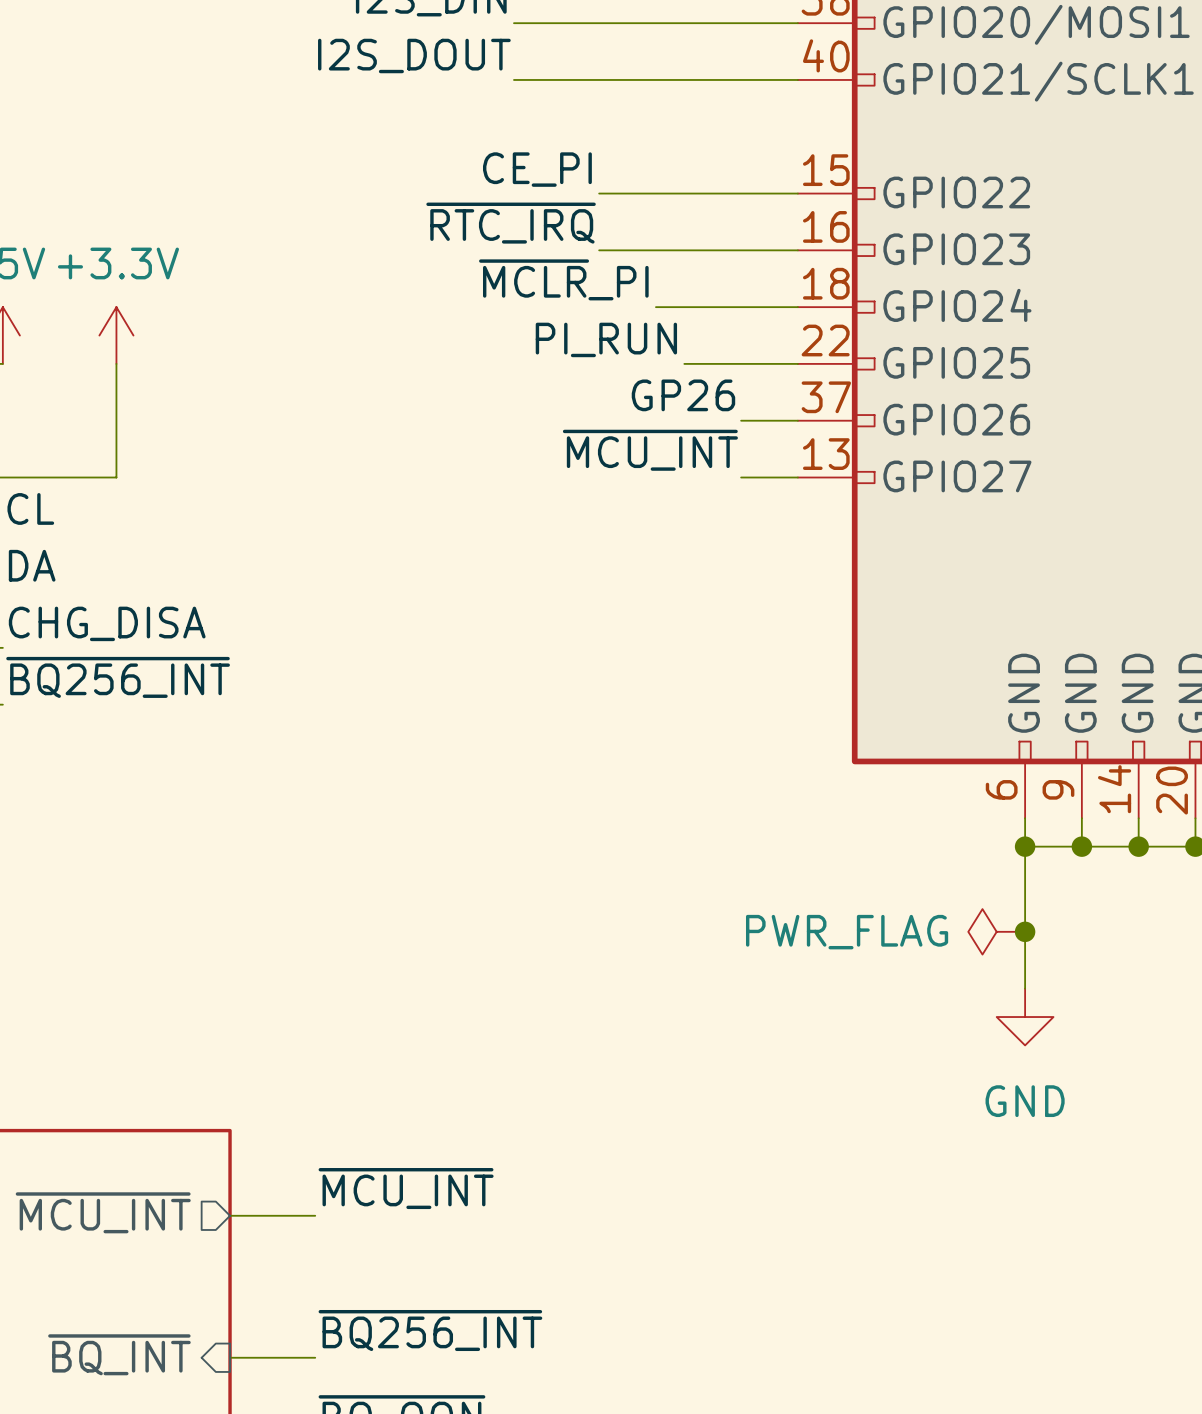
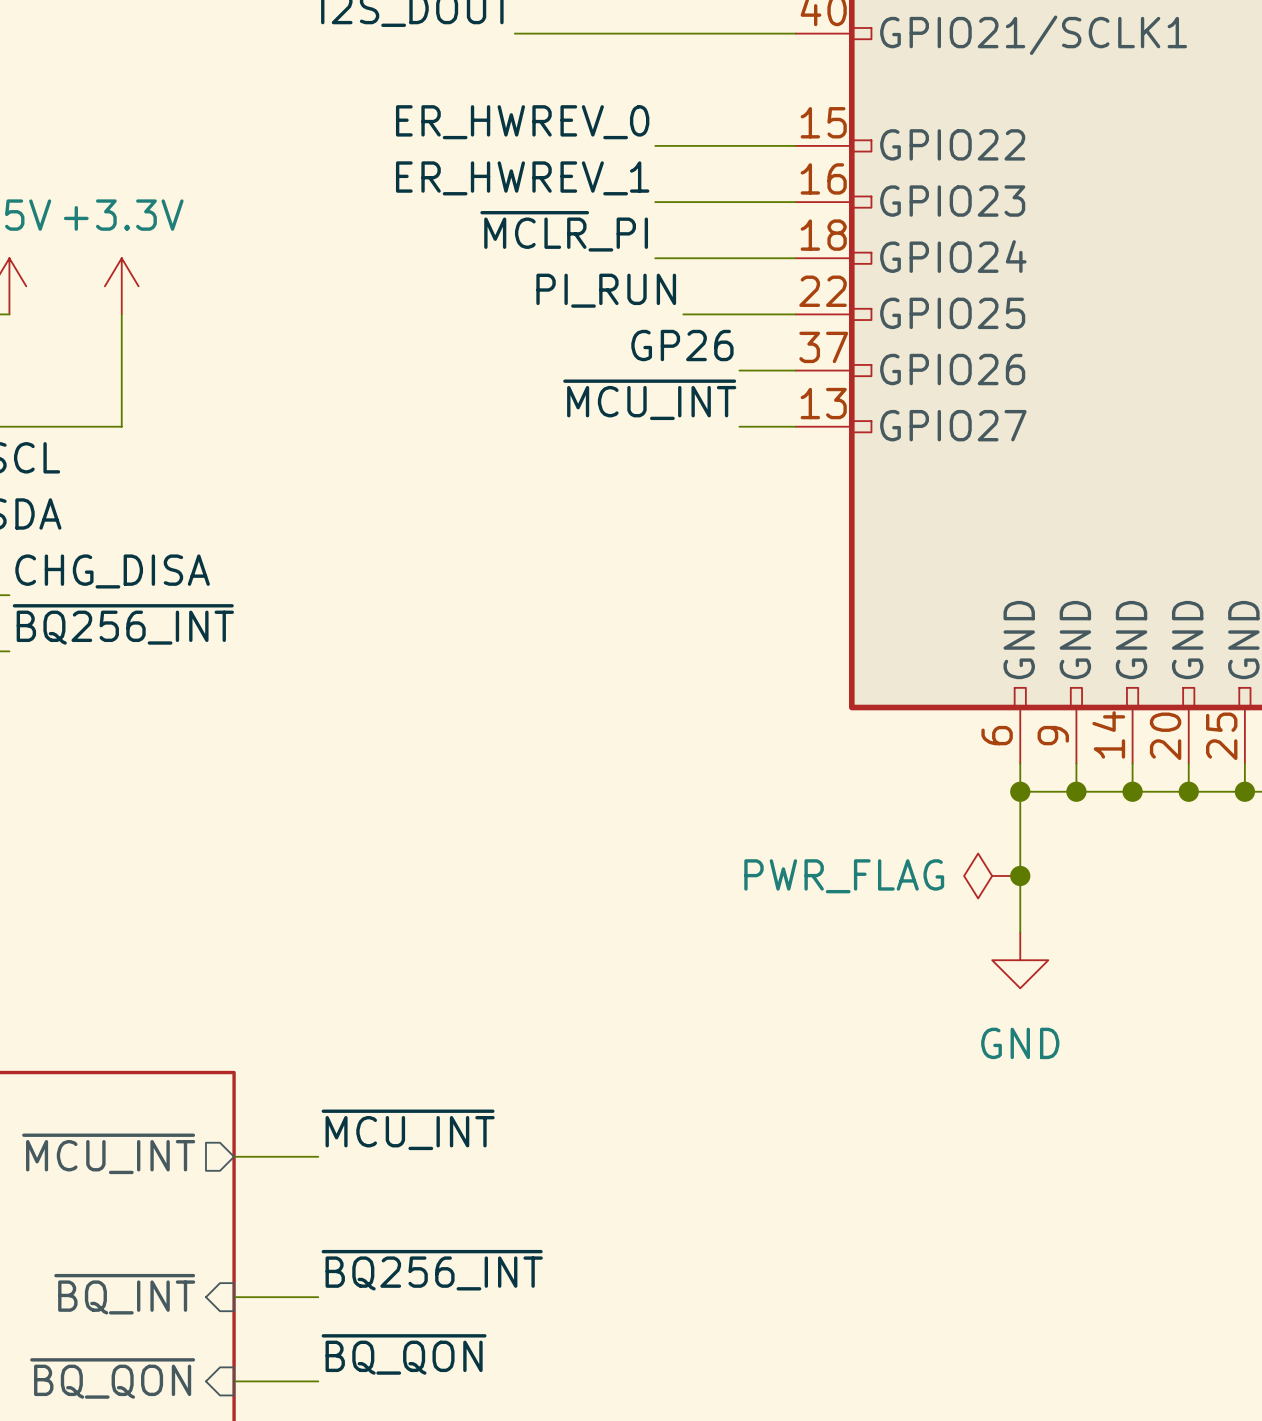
label: none -> ER_HWREV_0 (522, 122)
label: CE_PI (537, 169) -> none
wire: (599, 193) (655, 193) -> none
label: ~{RTC_IRQ} (511, 223) -> none
label: none -> ER_HWREV_1 (522, 178)
wire: (599, 250) (655, 250) -> none

